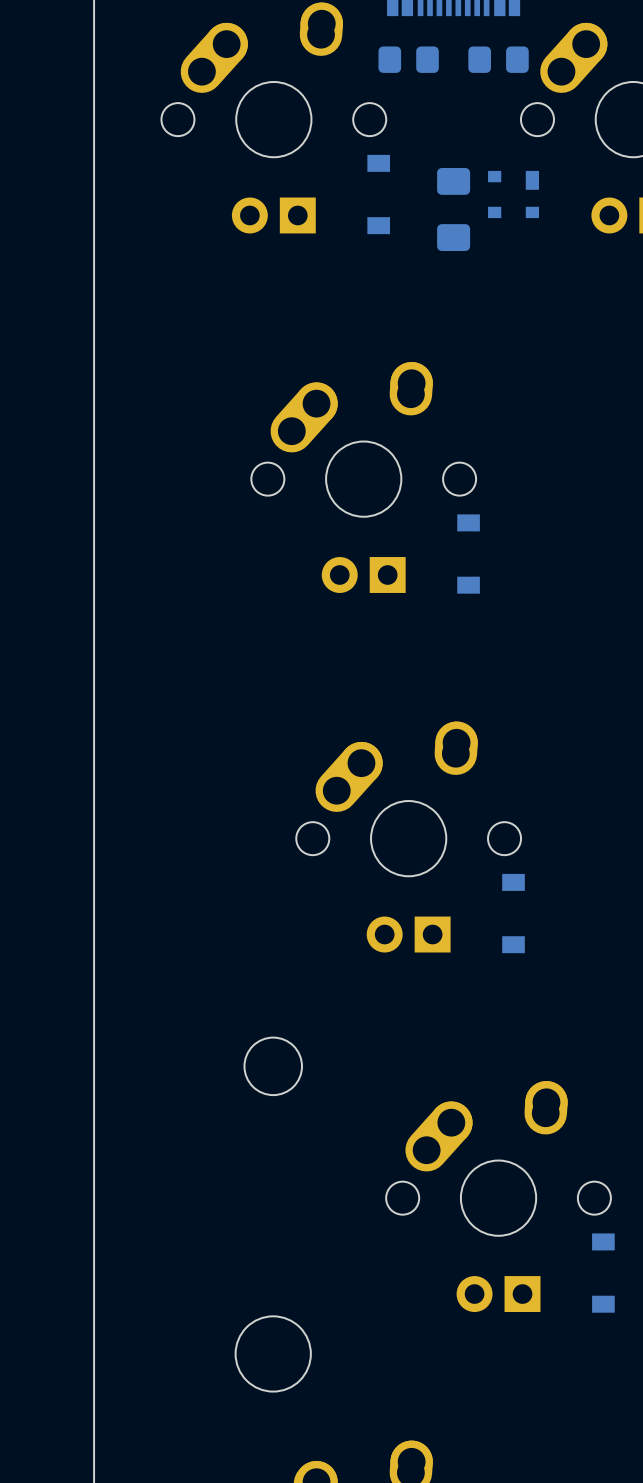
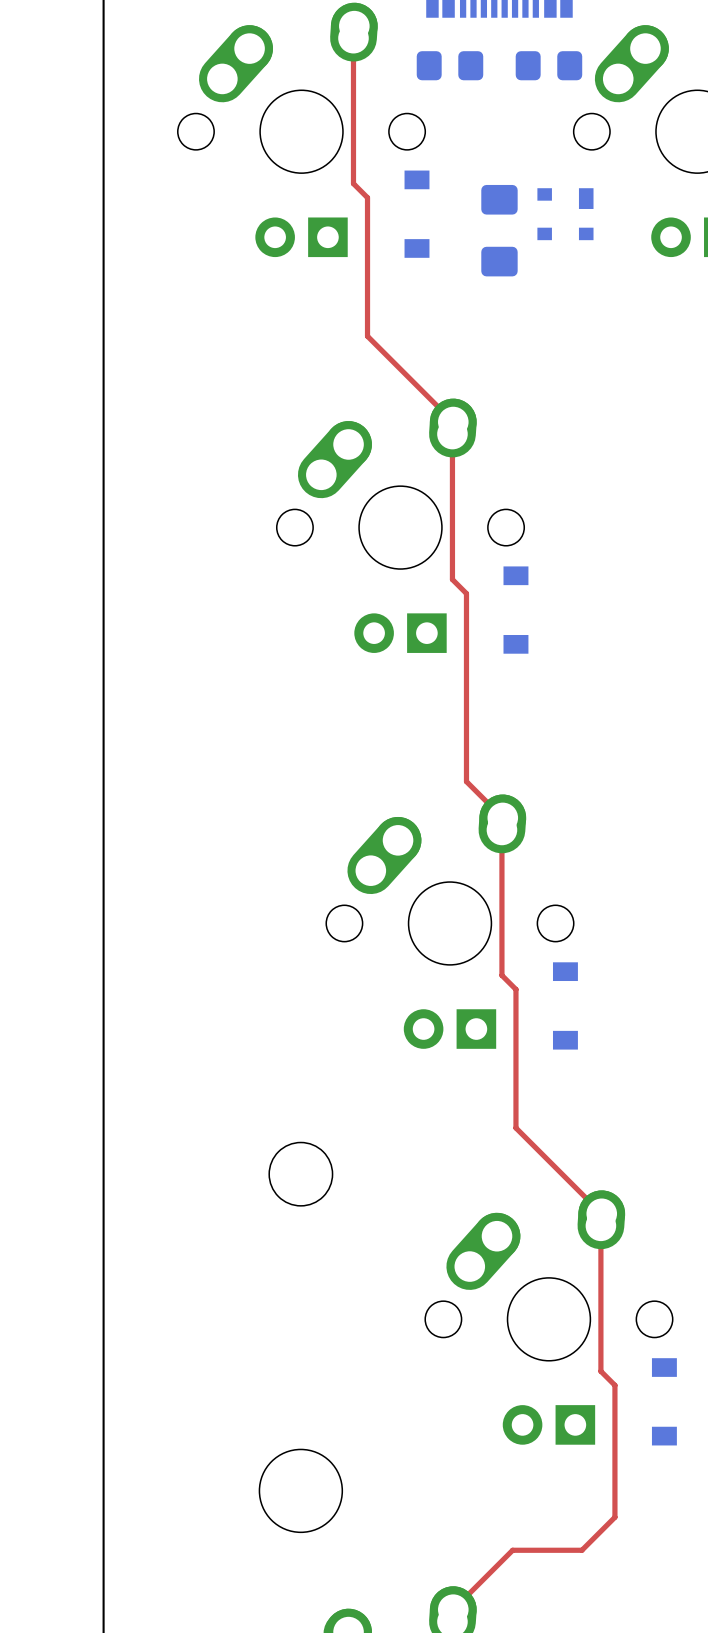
top track: none -> (353, 38) (353, 183) (367, 197) (367, 336) (453, 422)
top track: none -> (452, 434) (452, 579) (466, 593) (466, 781) (502, 817)
top track: none -> (501, 829) (501, 975) (515, 989) (515, 1128) (601, 1213)
top track: none -> (600, 1225) (600, 1371) (614, 1385) (614, 1517) (581, 1550) (512, 1550) (453, 1609)

